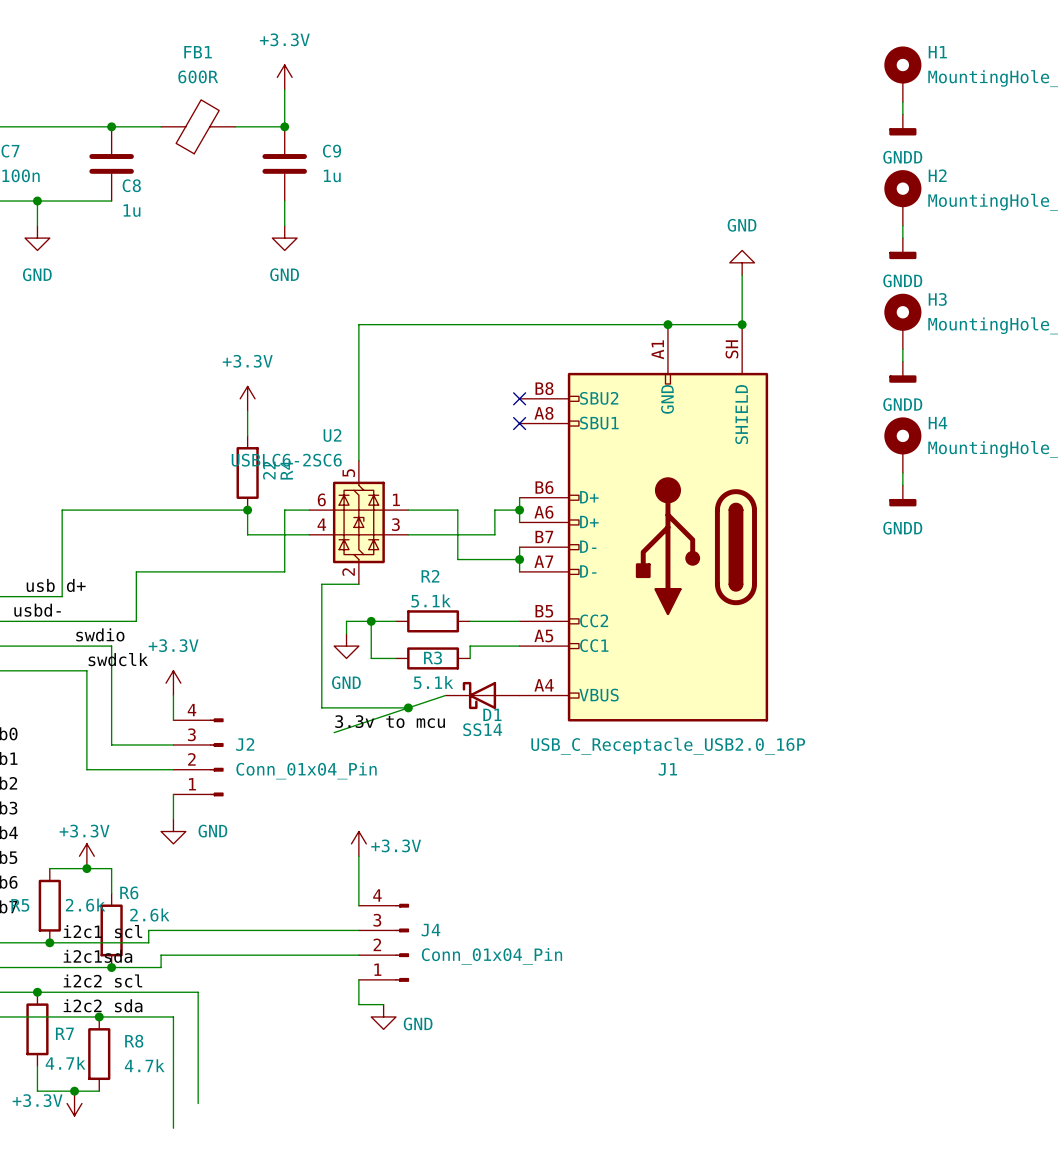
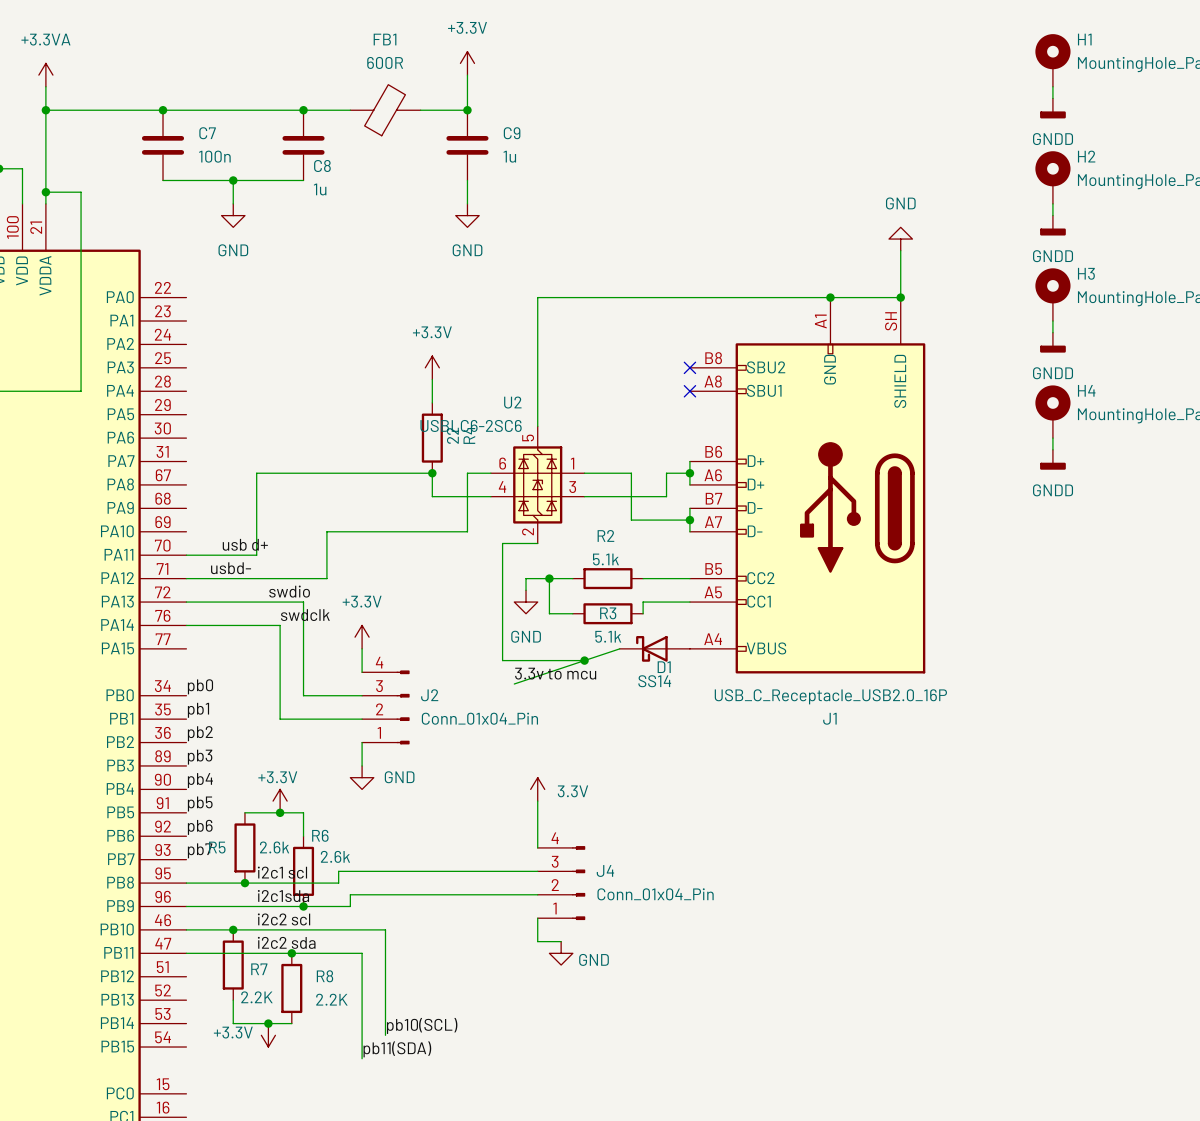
power symbol: +3.3V (358, 843) -> 3.3V (537, 789)
R7 value: 4.7k (65, 1063) -> 2.2K (256, 997)
R8 value: 4.7k (144, 1065) -> 2.2K (331, 999)
label: none -> pb10(SCL) (422, 1025)
label: none -> pb11(SDA) (397, 1049)

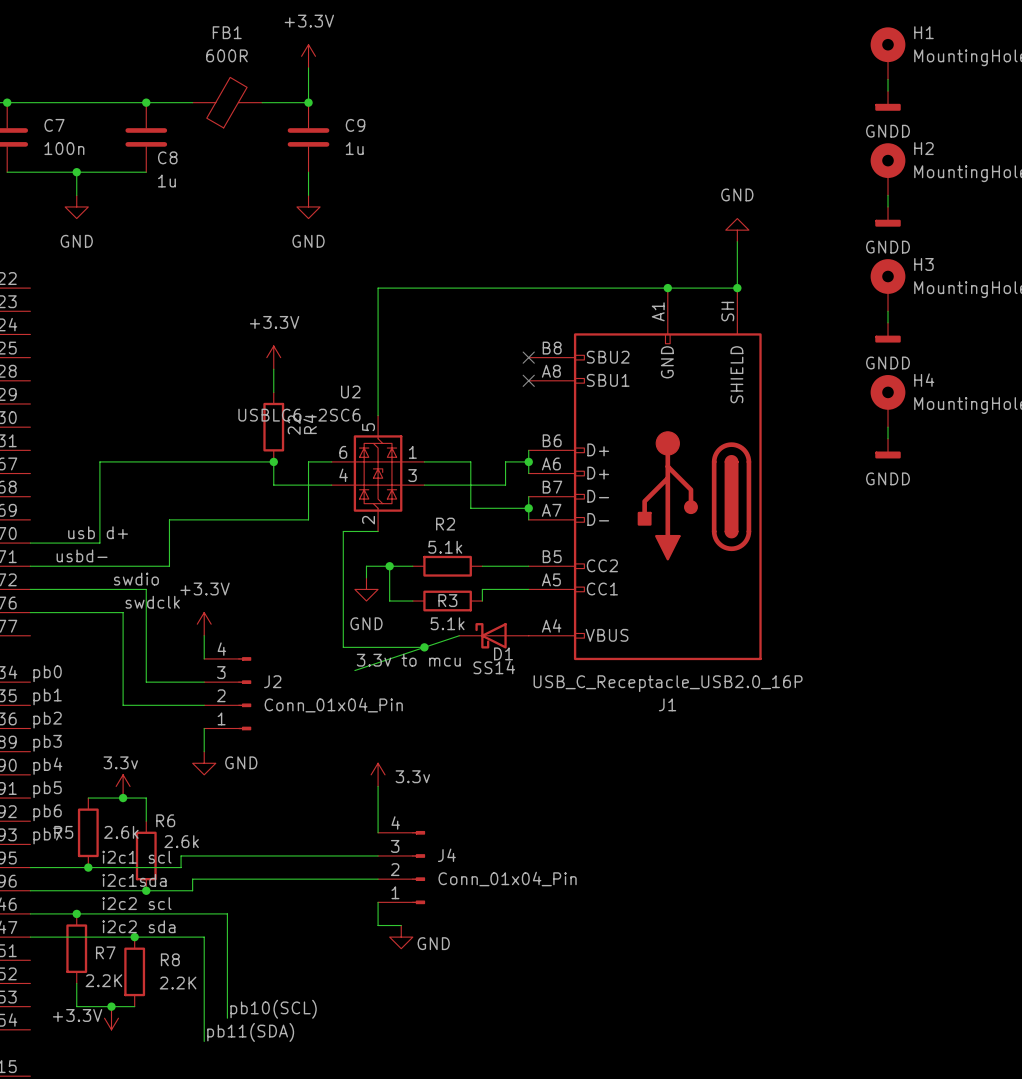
power symbol: 3.3V (537, 789) -> 3.3v (378, 774)
power symbol: +3.3V (280, 801) -> 3.3v (123, 786)

